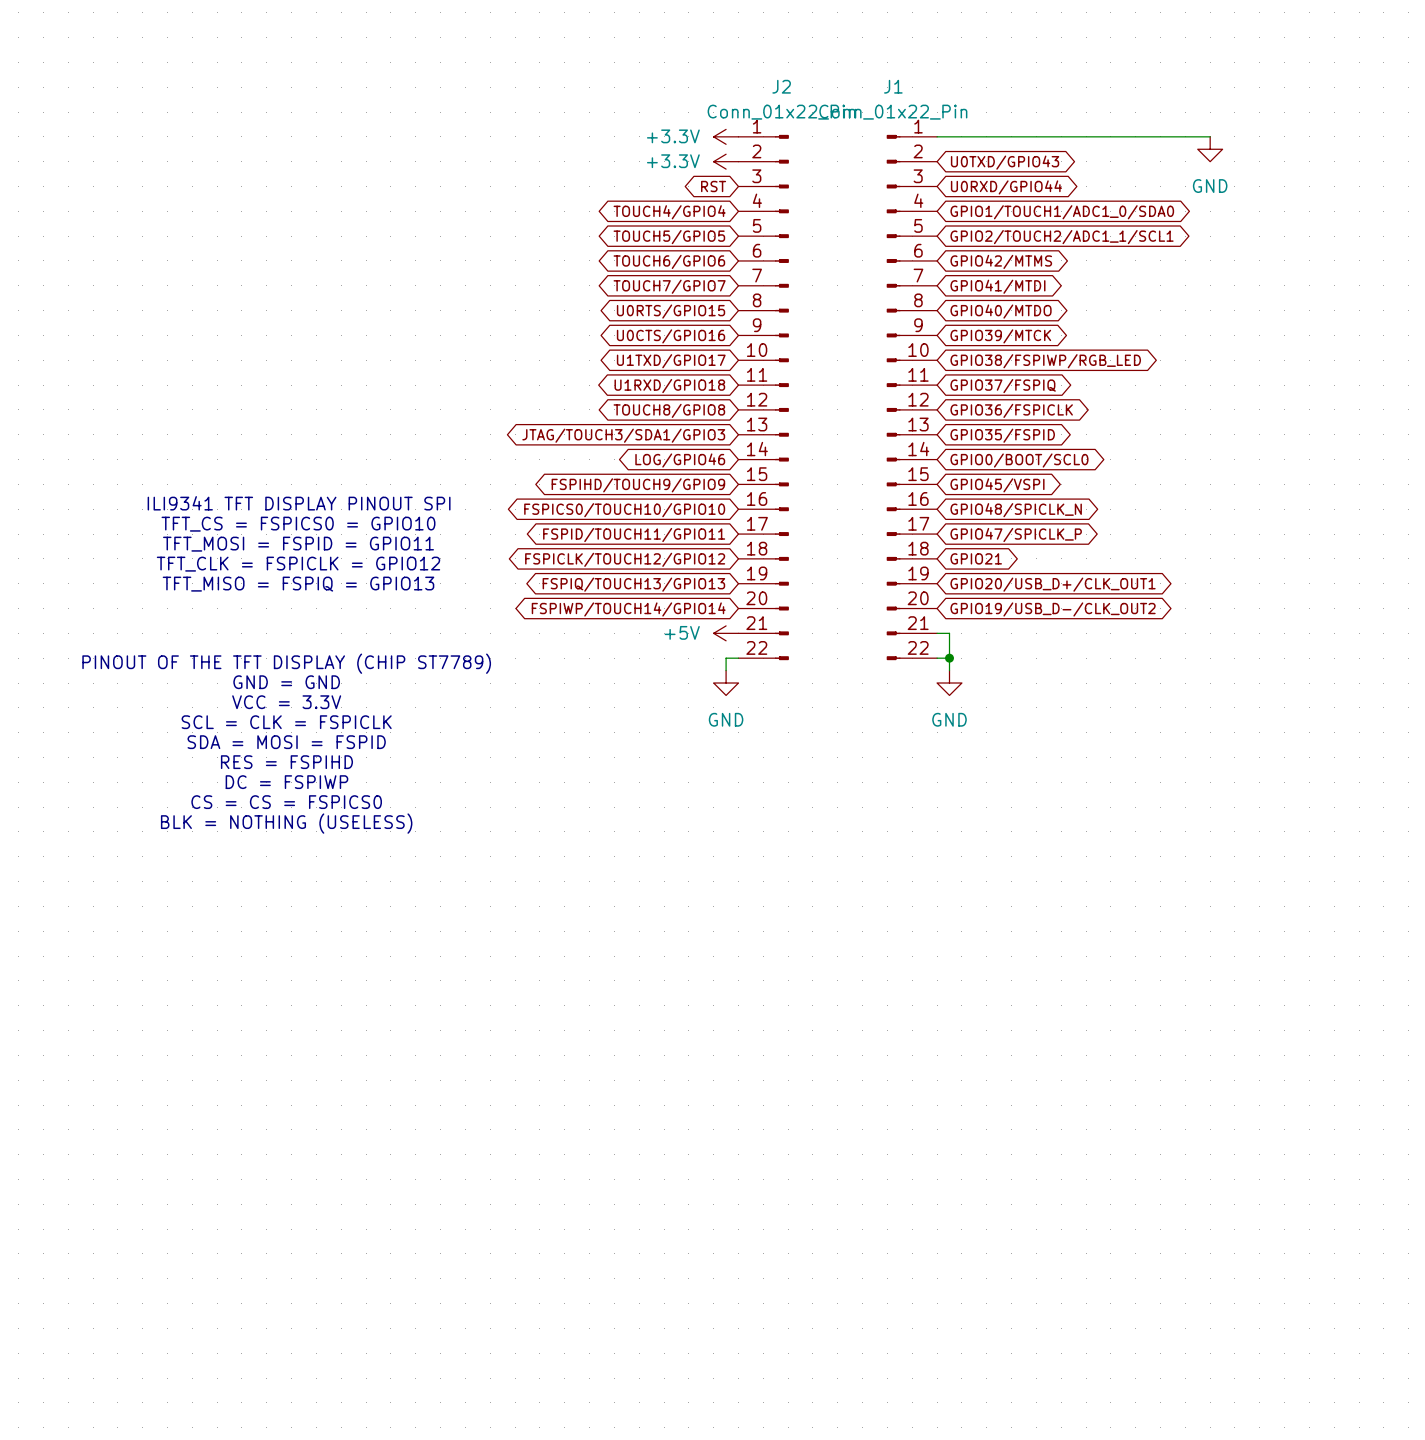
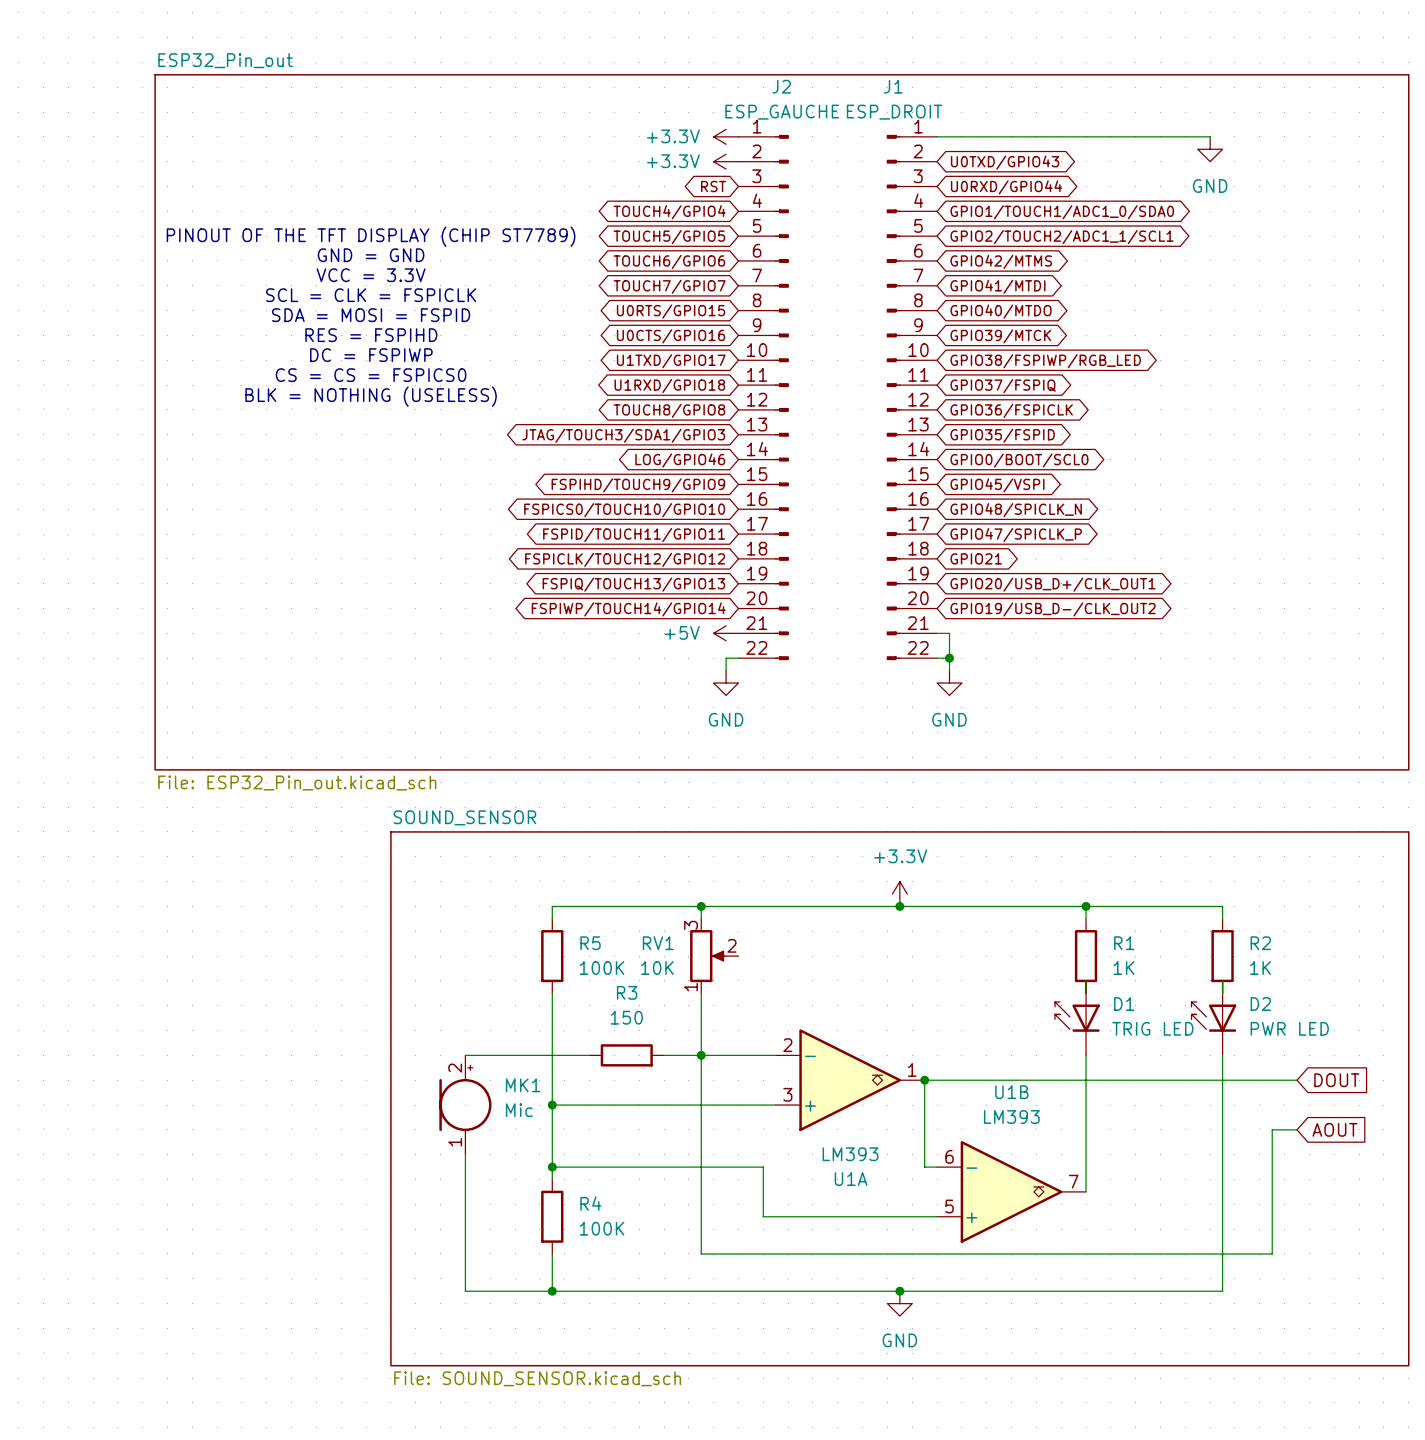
J2 value: Conn_01x22_Pin (781, 112) -> ESP_GAUCHE (782, 112)
J1 value: Conn_01x22_Pin (893, 112) -> ESP_DROIT (894, 112)
text: none -> PINOUT OF THE TFT DISPLAY (CHIP ST7789) (371, 236)
text: none -> GND = GND (371, 255)
text: none -> VCC = 3.3V (371, 275)
text: none -> SCL = CLK = FSPICLK (371, 295)
text: none -> SDA = MOSI = FSPID (371, 315)
text: none -> RES = FSPIHD (371, 335)
text: none -> DC = FSPIWP (371, 355)
text: none -> CS = CS = FSPICS0 (371, 375)
text: none -> BLK = NOTHING (USELESS) (371, 396)
sheet ESP32_Pin_out: none -> File: ESP32_Pin_out.kicad_sch (781, 422)
text: ILI9341 TFT DISPLAY PINOUT SPI (299, 503) -> none
text: TFT_CS = FSPICS0 = GPIO10 (298, 524) -> none
text: TFT_MOSI = FSPID = GPIO11 (298, 544) -> none
text: TFT_CLK = FSPICLK = GPIO12 (298, 564) -> none
text: TFT_MISO = FSPIQ = GPIO13 (298, 584) -> none
text: PINOUT OF THE TFT DISPLAY (CHIP ST7789) (286, 663) -> none
text: GND = GND (286, 682) -> none
text: VCC = 3.3V (286, 702) -> none
text: SCL = CLK = FSPICLK (286, 722) -> none
text: SDA = MOSI = FSPID (286, 742) -> none
text: RES = FSPIHD (286, 762) -> none
text: DC = FSPIWP (286, 782) -> none
text: CS = CS = FSPICS0 (286, 802) -> none
text: BLK = NOTHING (USELESS) (286, 823) -> none
power symbol: none -> +3.3V (899, 894)
wire: none -> (701, 906) (701, 918)
junction: none -> (701, 906)
junction: none -> (899, 906)
wire: none -> (1086, 906) (1086, 918)
junction: none -> (1086, 906)
wire: none -> (552, 918) (552, 906) (1222, 906) (1222, 918)
R5: none -> 100K (552, 956)
RV1: none -> 10K (714, 956)
R1: none -> 1K (1086, 956)
R2: none -> 1K (1222, 956)
wire: none -> (1086, 980) (1086, 993)
wire: none -> (1222, 980) (1222, 993)
wire: none -> (552, 993) (552, 1179)
wire: none -> (701, 993) (701, 1253) (1272, 1253) (1272, 1129) (1297, 1129)
D1: none -> TRIG LED (1077, 1018)
D2: none -> PWR LED (1213, 1018)
wire: none -> (465, 1055) (589, 1055)
R3: none -> 150 (626, 1055)
wire: none -> (664, 1055) (775, 1055)
junction: none -> (701, 1055)
wire: none -> (1086, 1055) (1086, 1191)
wire: none -> (1222, 1055) (1222, 1291) (465, 1291) (465, 1154)
U1A: none -> LM393 (850, 1080)
junction: none -> (924, 1080)
wire: none -> (1297, 1080) (924, 1080) (924, 1167) (937, 1167)
global label: none -> DOUT (1336, 1080)
sheet SOUND_SENSOR: none -> File: SOUND_SENSOR.kicad_sch (899, 1098)
MK1: none -> Mic (465, 1105)
wire: none -> (552, 1105) (775, 1105)
junction: none -> (552, 1105)
global label: none -> AOUT (1335, 1129)
wire: none -> (552, 1167) (763, 1167) (763, 1216) (937, 1216)
junction: none -> (552, 1167)
U1B: none -> LM393 (1011, 1191)
R4: none -> 100K (552, 1216)
wire: none -> (552, 1253) (552, 1291)
junction: none -> (552, 1291)
junction: none -> (899, 1291)
power symbol: none -> GND (899, 1303)

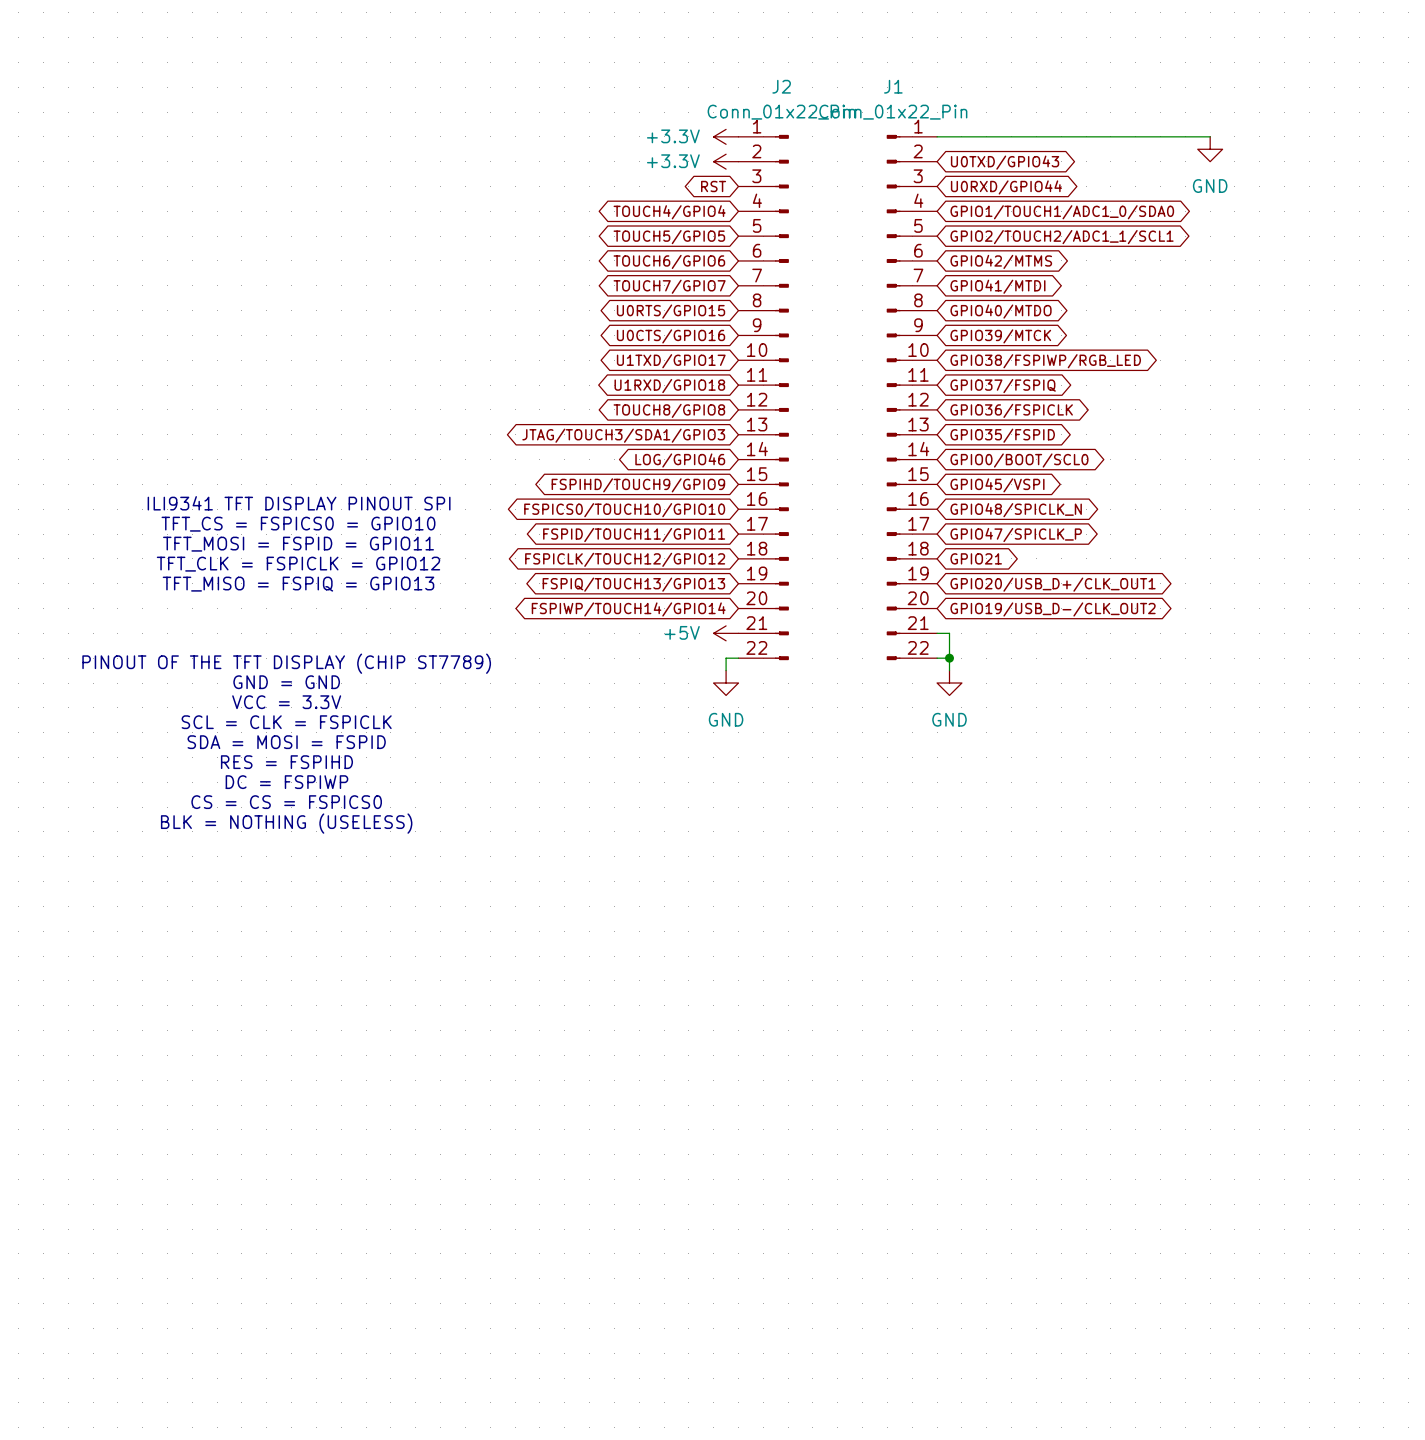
J2 value: ESP_GAUCHE (782, 112) -> Conn_01x22_Pin (781, 112)
J1 value: ESP_DROIT (894, 112) -> Conn_01x22_Pin (893, 112)
text: PINOUT OF THE TFT DISPLAY (CHIP ST7789) (371, 236) -> none
text: GND = GND (371, 255) -> none
text: VCC = 3.3V (371, 275) -> none
text: SCL = CLK = FSPICLK (371, 295) -> none
text: SDA = MOSI = FSPID (371, 315) -> none
text: RES = FSPIHD (371, 335) -> none
text: DC = FSPIWP (371, 355) -> none
text: CS = CS = FSPICS0 (371, 375) -> none
text: BLK = NOTHING (USELESS) (371, 396) -> none
sheet ESP32_Pin_out: File: ESP32_Pin_out.kicad_sch (781, 422) -> none
text: none -> ILI9341 TFT DISPLAY PINOUT SPI (299, 503)
text: none -> TFT_CS = FSPICS0 = GPIO10 (298, 524)
text: none -> TFT_MOSI = FSPID = GPIO11 (298, 544)
text: none -> TFT_CLK = FSPICLK = GPIO12 (298, 564)
text: none -> TFT_MISO = FSPIQ = GPIO13 (298, 584)
text: none -> PINOUT OF THE TFT DISPLAY (CHIP ST7789) (286, 663)
text: none -> GND = GND (286, 682)
text: none -> VCC = 3.3V (286, 702)
text: none -> SCL = CLK = FSPICLK (286, 722)
text: none -> SDA = MOSI = FSPID (286, 742)
text: none -> RES = FSPIHD (286, 762)
text: none -> DC = FSPIWP (286, 782)
text: none -> CS = CS = FSPICS0 (286, 802)
text: none -> BLK = NOTHING (USELESS) (286, 823)
power symbol: +3.3V (899, 894) -> none
wire: (701, 906) (701, 918) -> none
junction: (701, 906) -> none
junction: (899, 906) -> none
wire: (1086, 906) (1086, 918) -> none
junction: (1086, 906) -> none
wire: (552, 918) (552, 906) (1222, 906) (1222, 918) -> none
R5: 100K (552, 956) -> none
RV1: 10K (714, 956) -> none
R1: 1K (1086, 956) -> none
R2: 1K (1222, 956) -> none
wire: (1086, 980) (1086, 993) -> none
wire: (1222, 980) (1222, 993) -> none
wire: (552, 993) (552, 1179) -> none
wire: (701, 993) (701, 1253) (1272, 1253) (1272, 1129) (1297, 1129) -> none
D1: TRIG LED (1077, 1018) -> none
D2: PWR LED (1213, 1018) -> none
wire: (465, 1055) (589, 1055) -> none
R3: 150 (626, 1055) -> none
wire: (664, 1055) (775, 1055) -> none
junction: (701, 1055) -> none
wire: (1086, 1055) (1086, 1191) -> none
wire: (1222, 1055) (1222, 1291) (465, 1291) (465, 1154) -> none
U1A: LM393 (850, 1080) -> none
junction: (924, 1080) -> none
wire: (1297, 1080) (924, 1080) (924, 1167) (937, 1167) -> none
global label: DOUT (1336, 1080) -> none
sheet SOUND_SENSOR: File: SOUND_SENSOR.kicad_sch (899, 1098) -> none
MK1: Mic (465, 1105) -> none
wire: (552, 1105) (775, 1105) -> none
junction: (552, 1105) -> none
global label: AOUT (1335, 1129) -> none
wire: (552, 1167) (763, 1167) (763, 1216) (937, 1216) -> none
junction: (552, 1167) -> none
U1B: LM393 (1011, 1191) -> none
R4: 100K (552, 1216) -> none
wire: (552, 1253) (552, 1291) -> none
junction: (552, 1291) -> none
junction: (899, 1291) -> none
power symbol: GND (899, 1303) -> none

